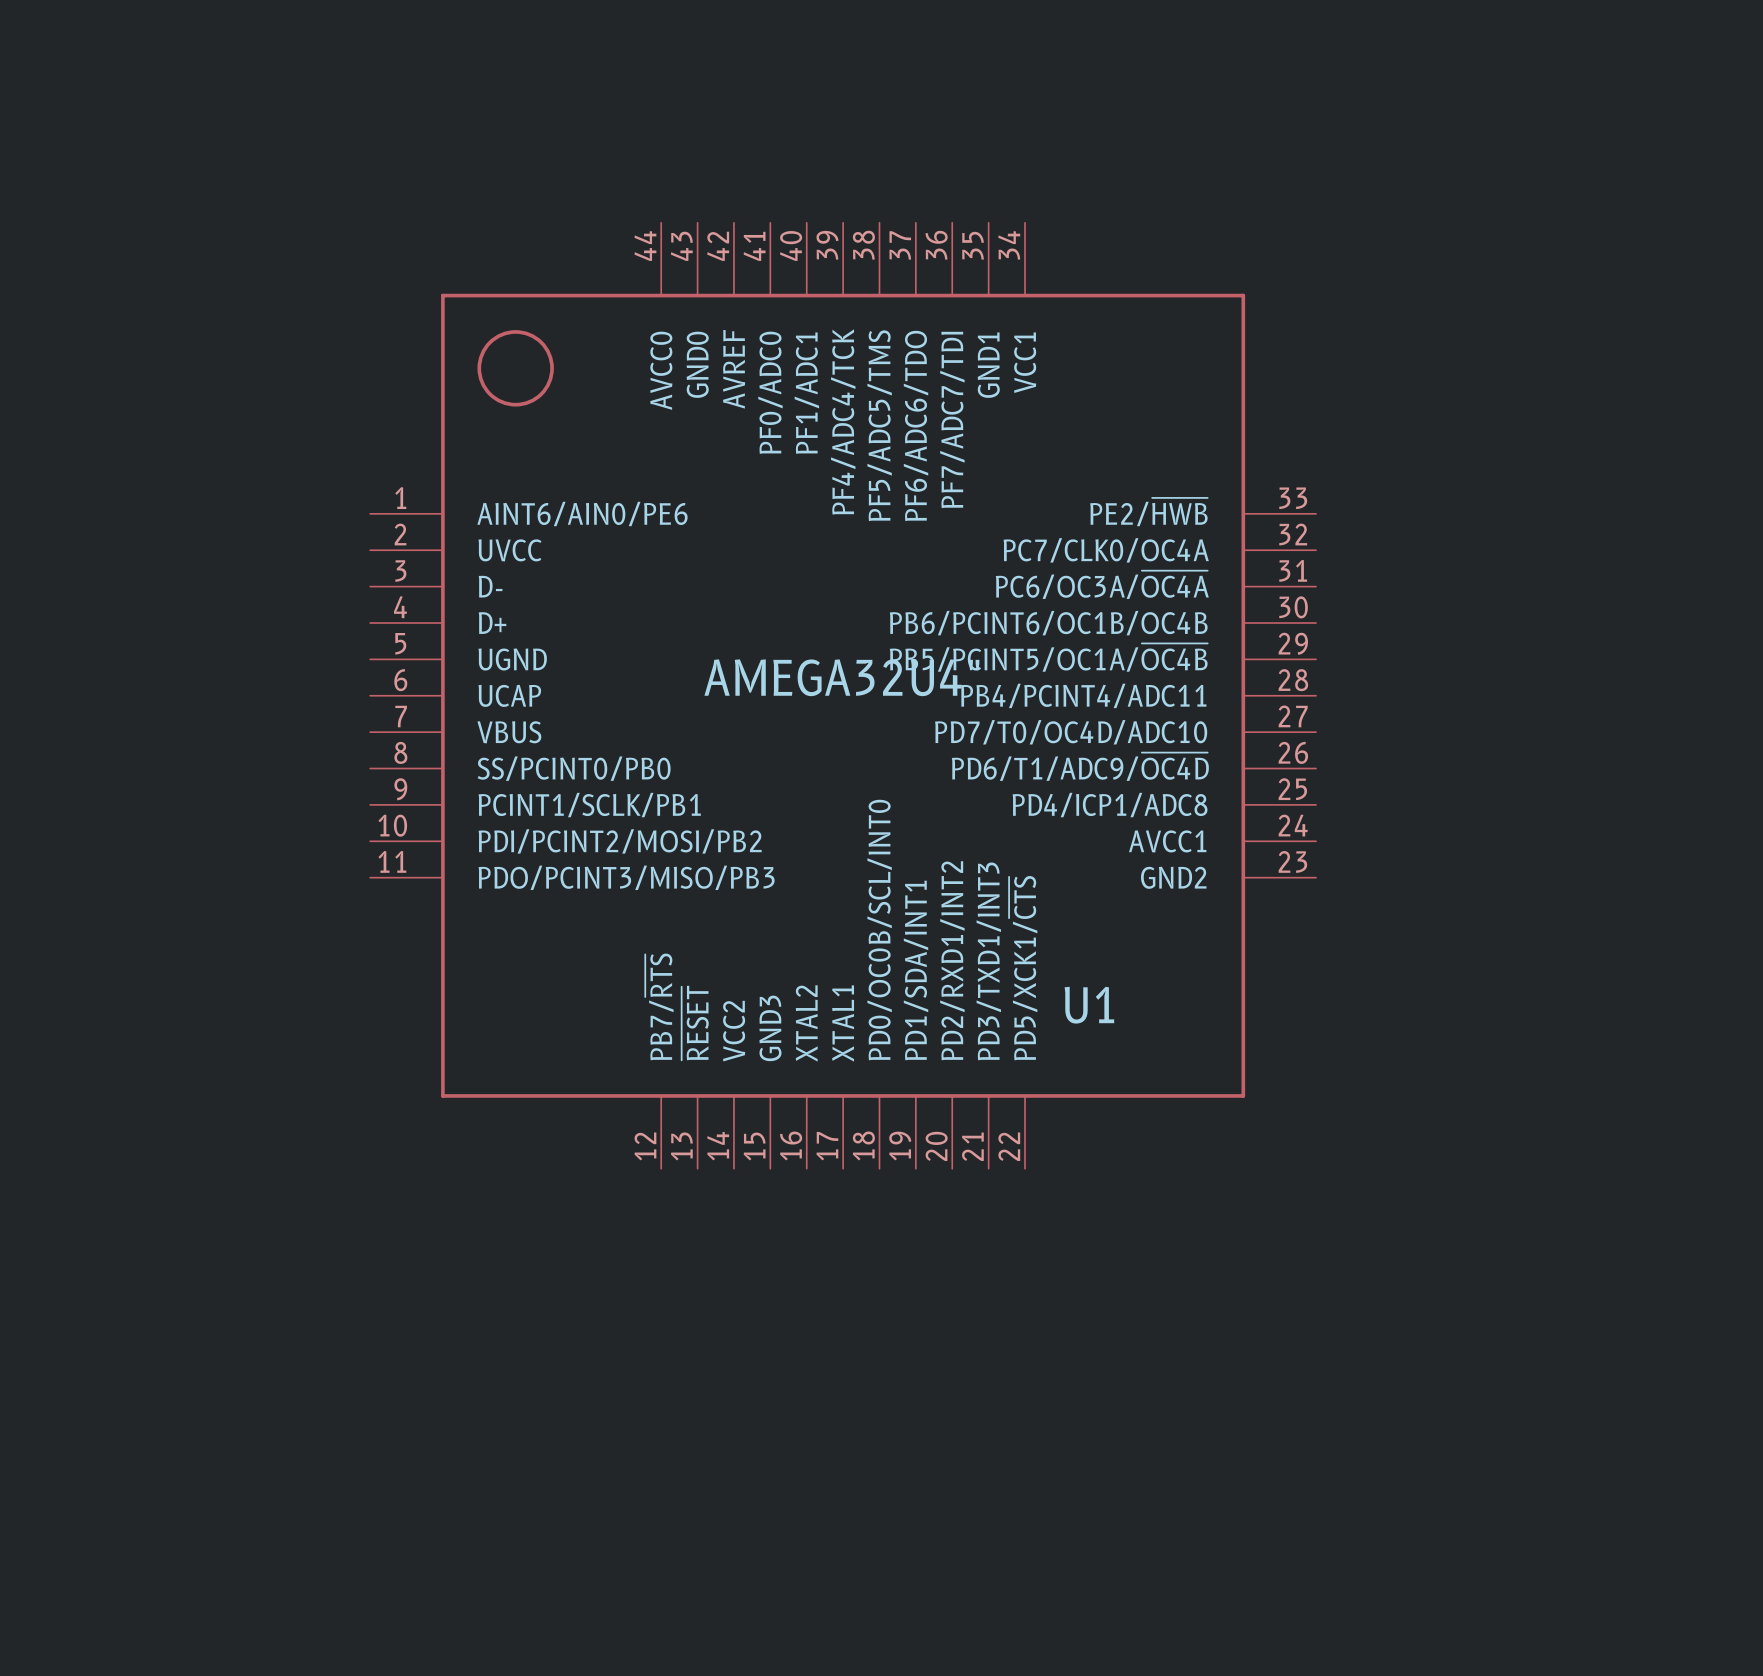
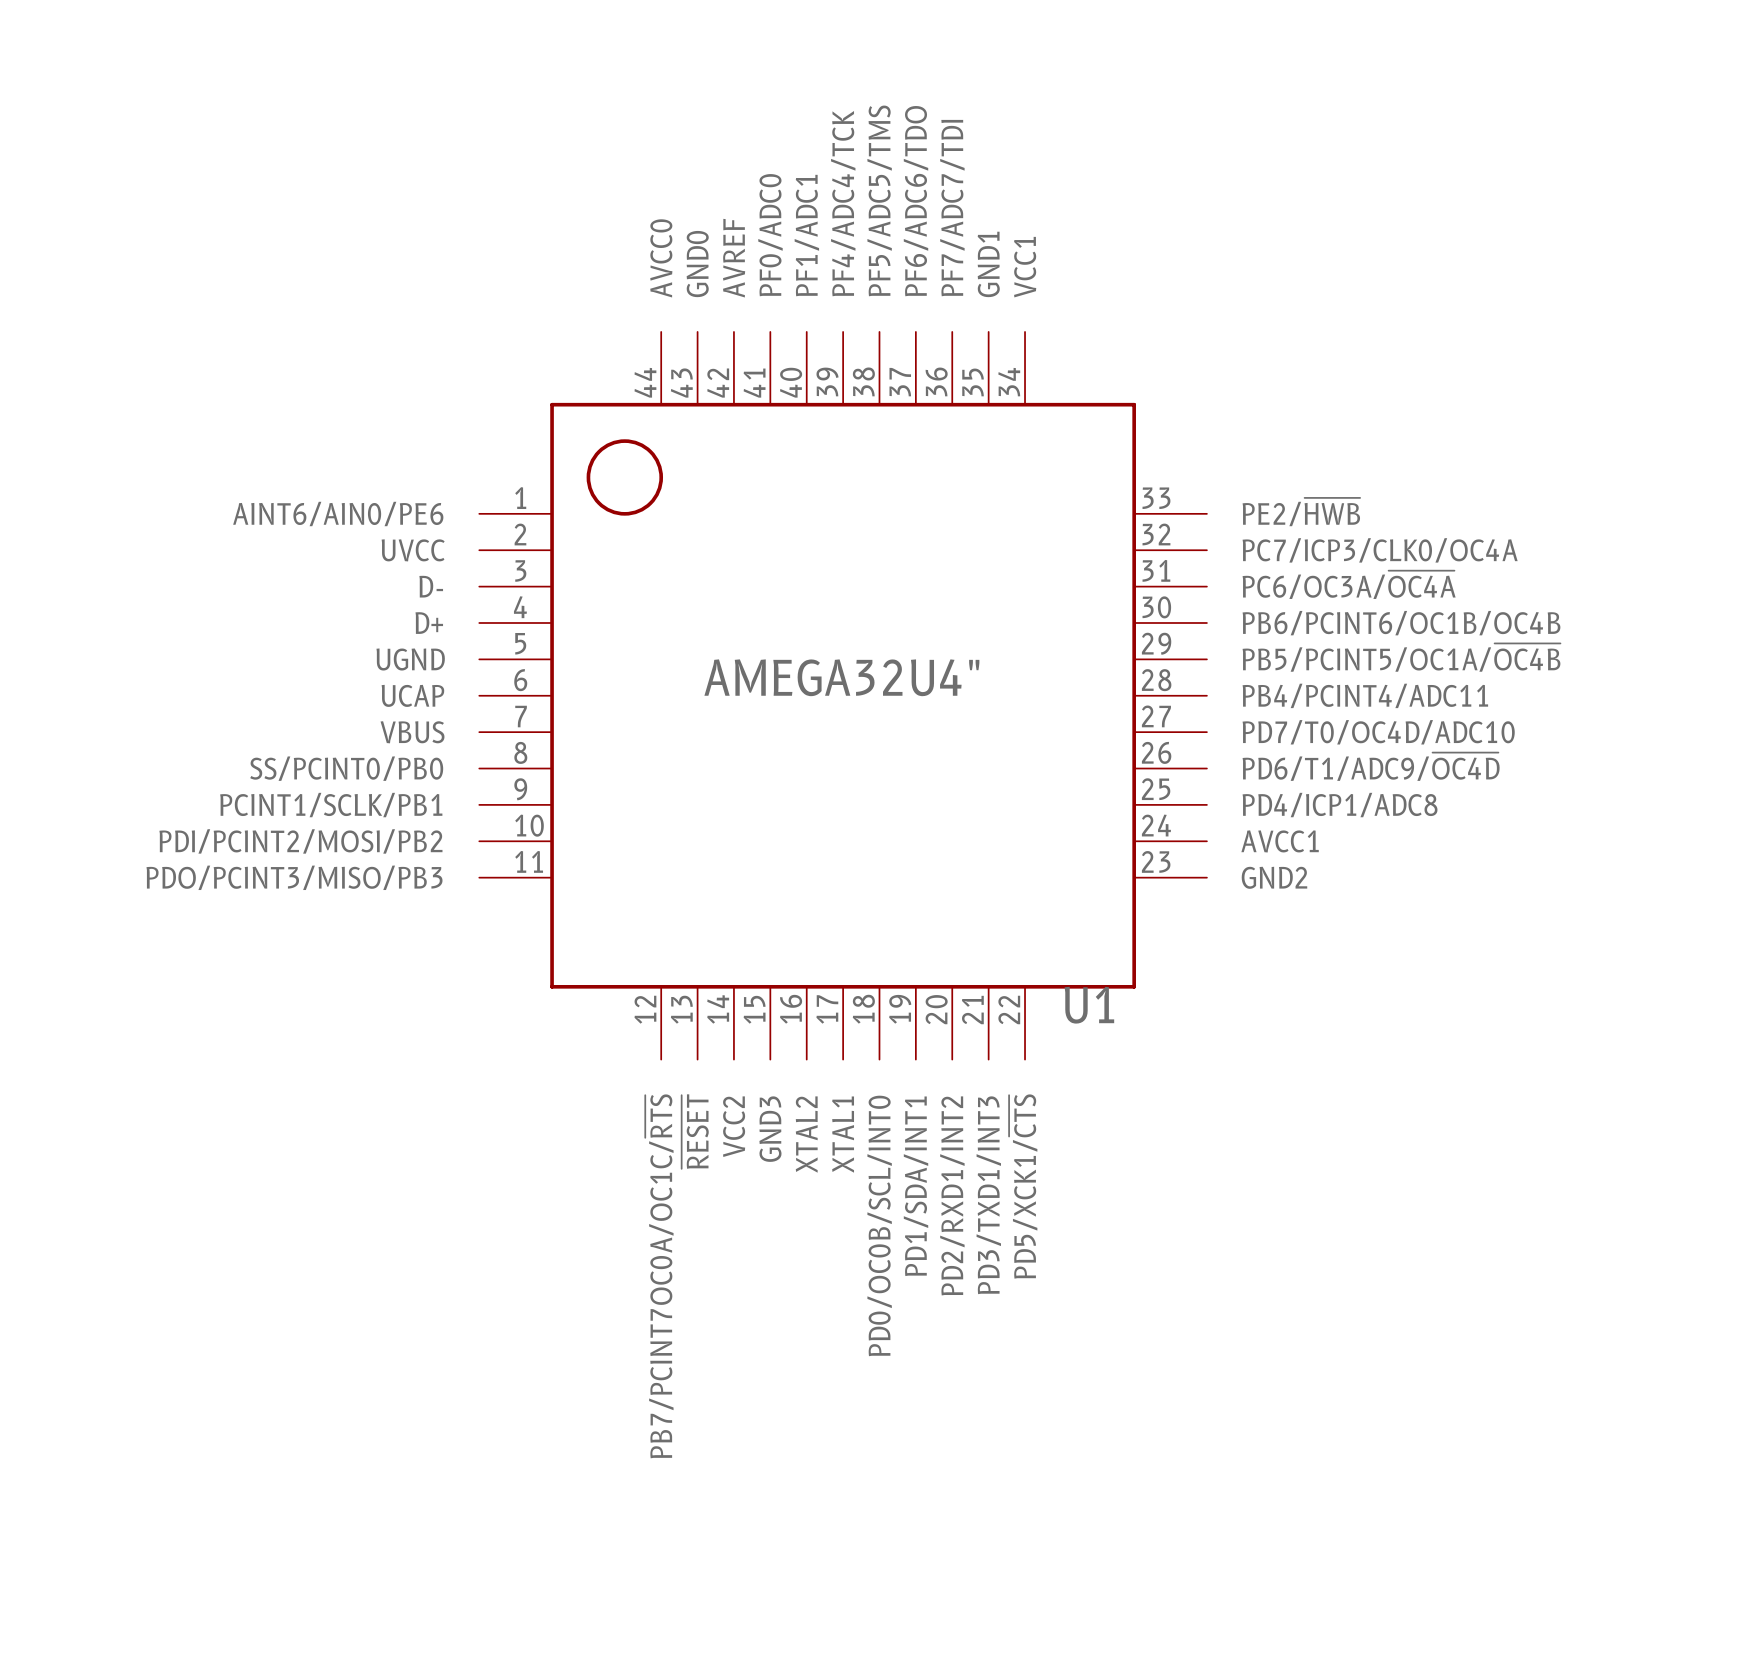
U1 symbol: [370, 222, 1317, 1169] -> [479, 331, 1207, 1060]

